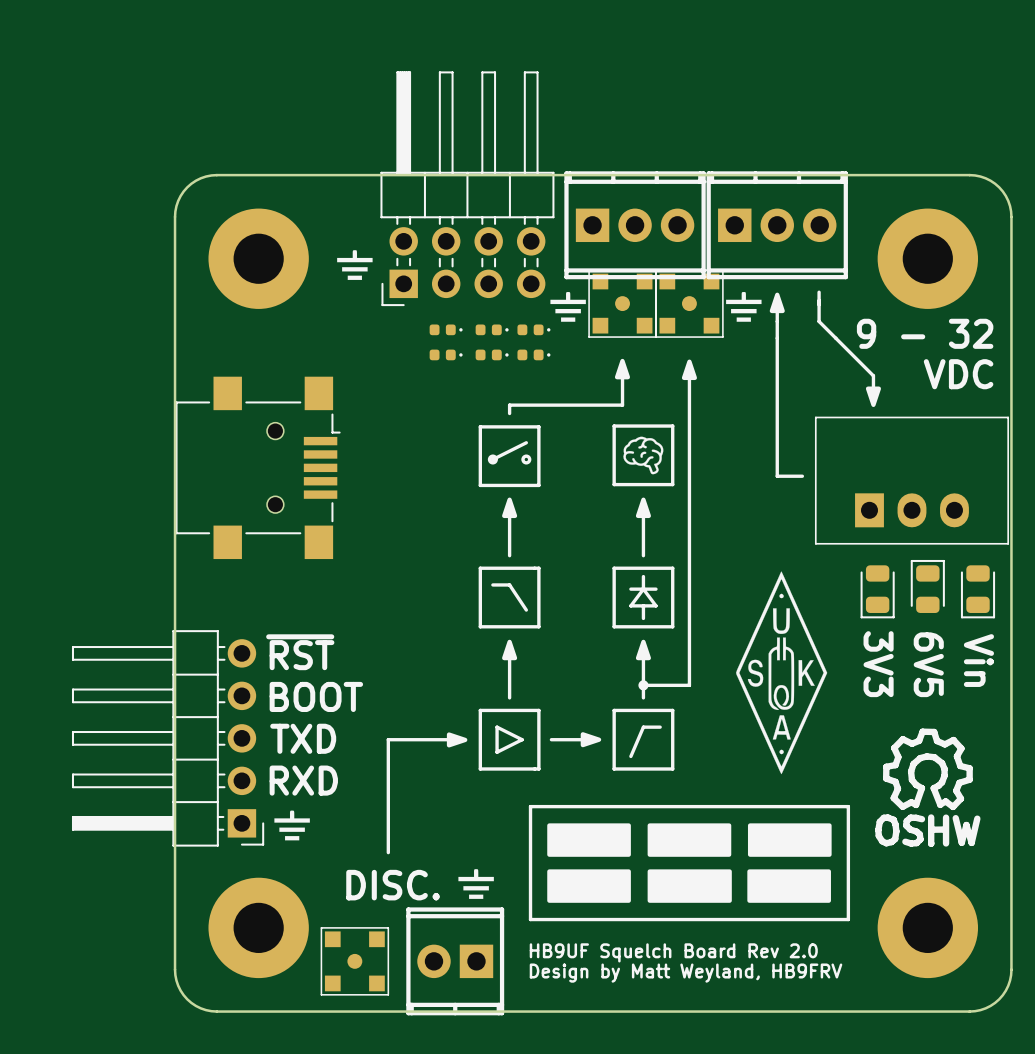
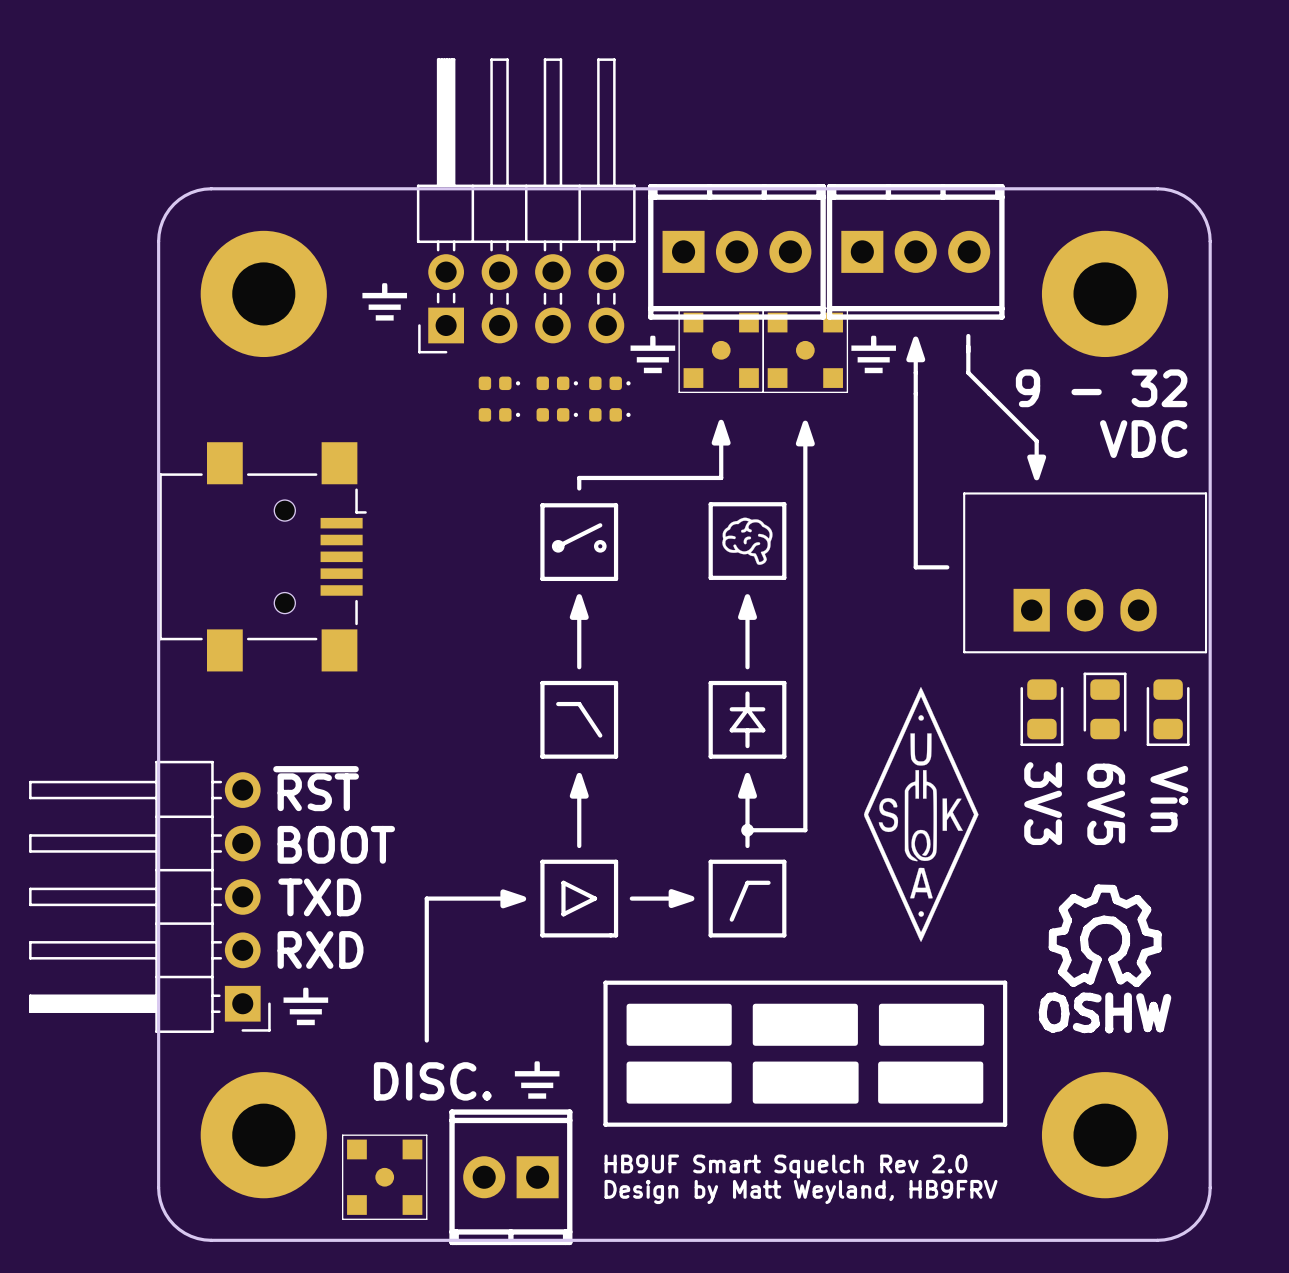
text: HB9UF Squelch Board Rev 2.0 (673, 952) -> HB9UF Smart Squelch Rev 2.0 (786, 1166)

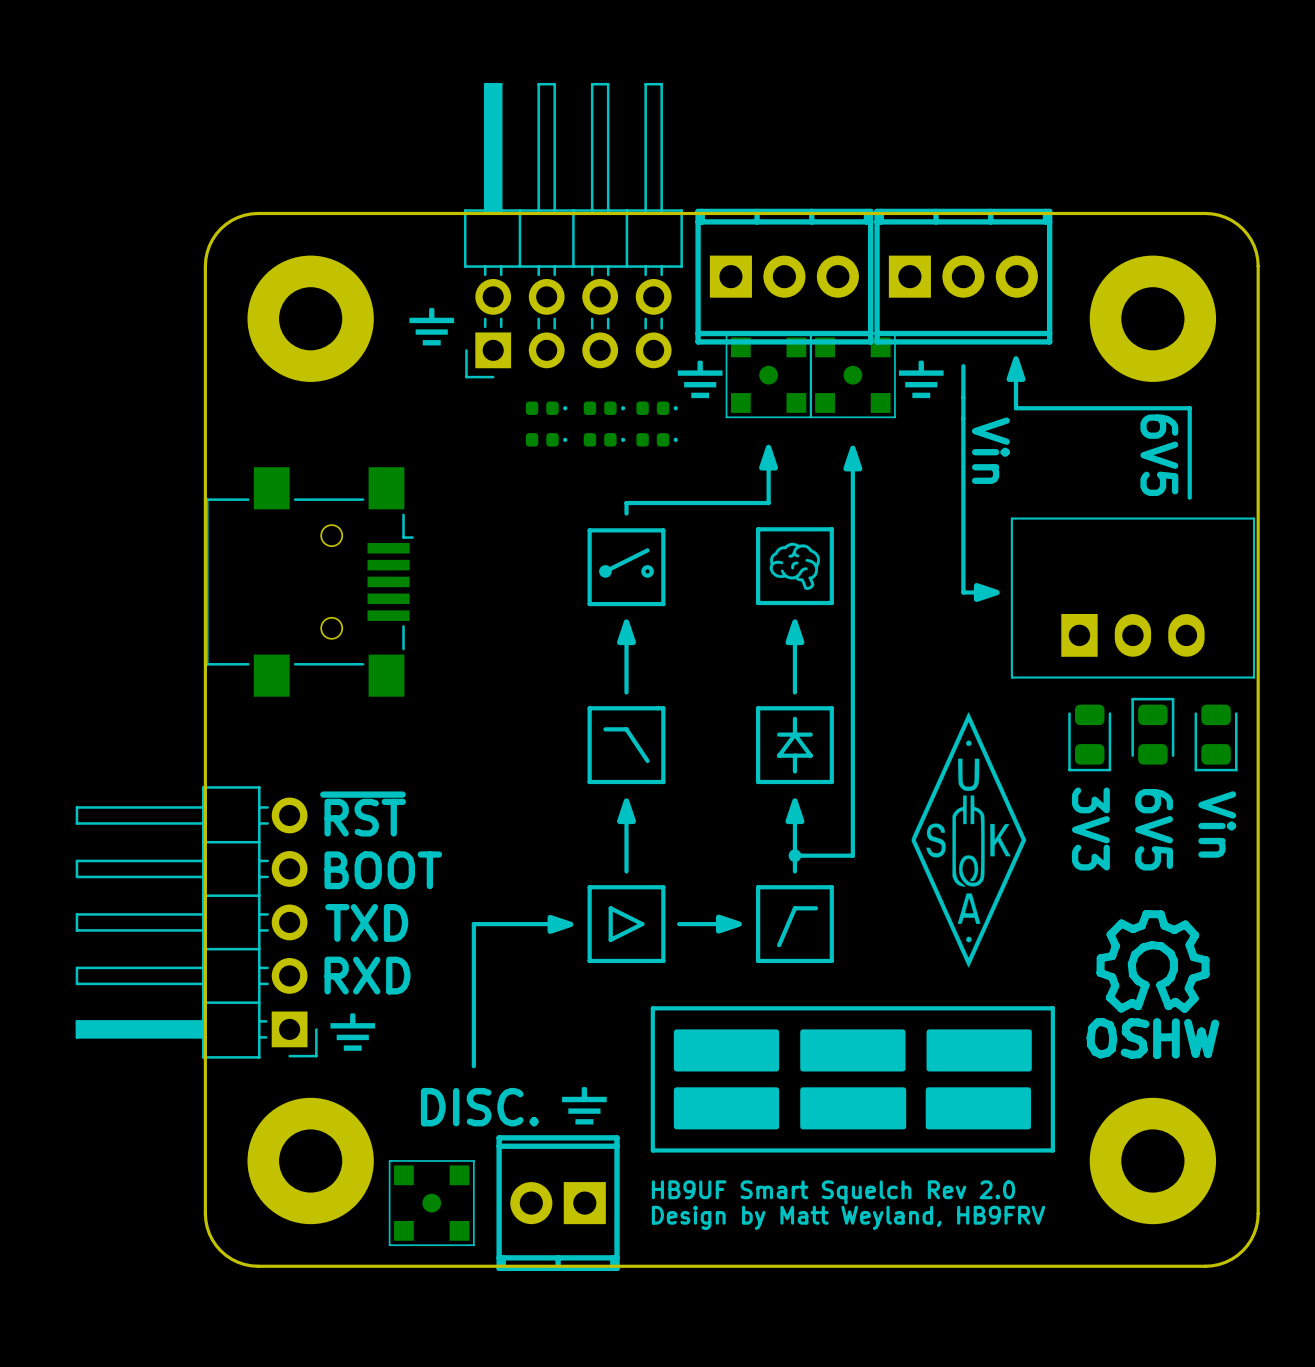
drawing position: (915, 349) -> (1016, 369)
line: (968, 372) (1036, 441) (1036, 467) -> (1016, 397) (1016, 408) (1189, 408) (1189, 497)
text: 9 - 32 (1101, 388) -> none
text: none -> Vin (990, 450)
text: none -> 6V5 (1159, 455)
text: VDC (1143, 439) -> none
drawing: [1027, 454, 1047, 481] -> none
drawing: none -> [973, 582, 1000, 602]

